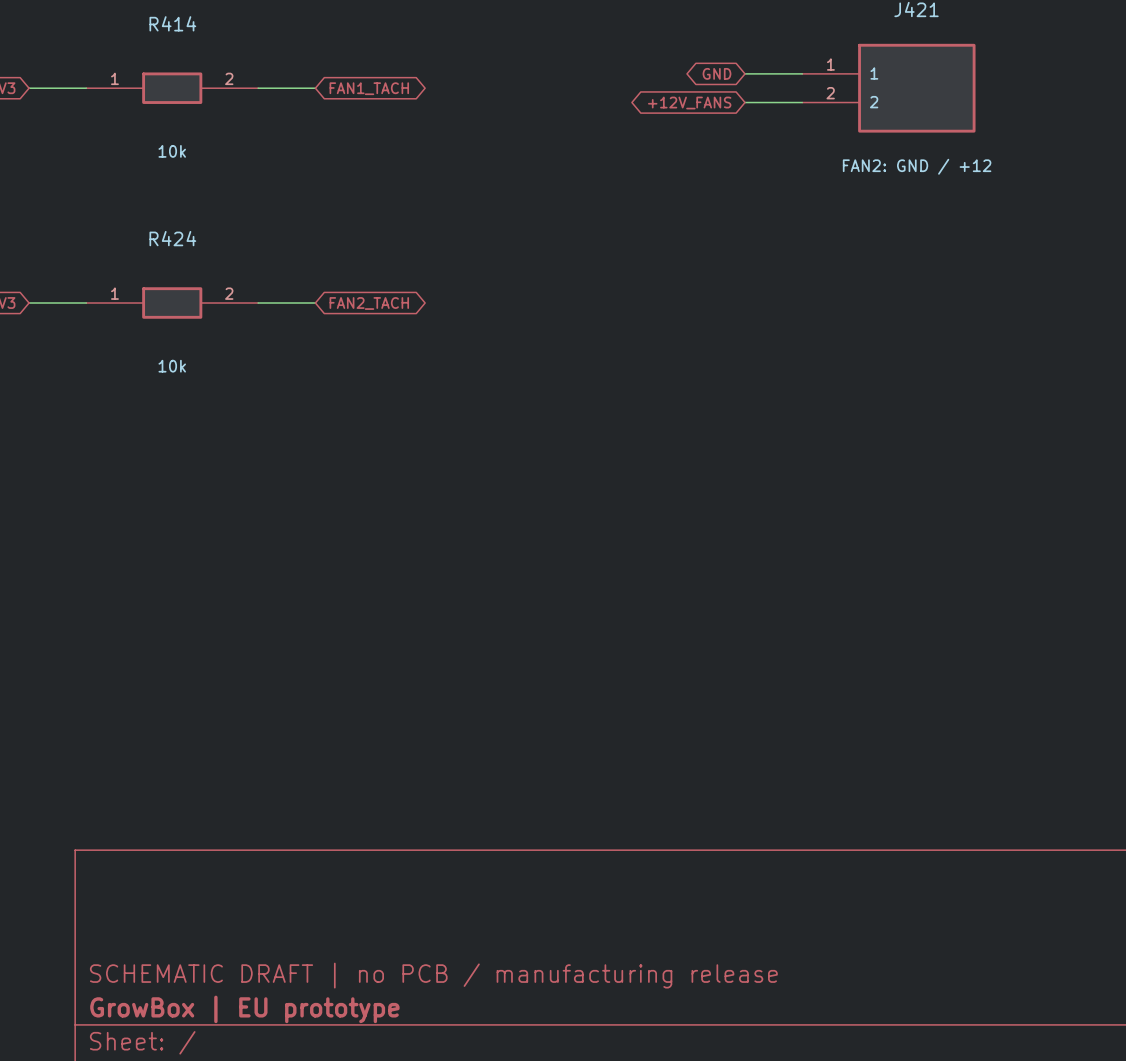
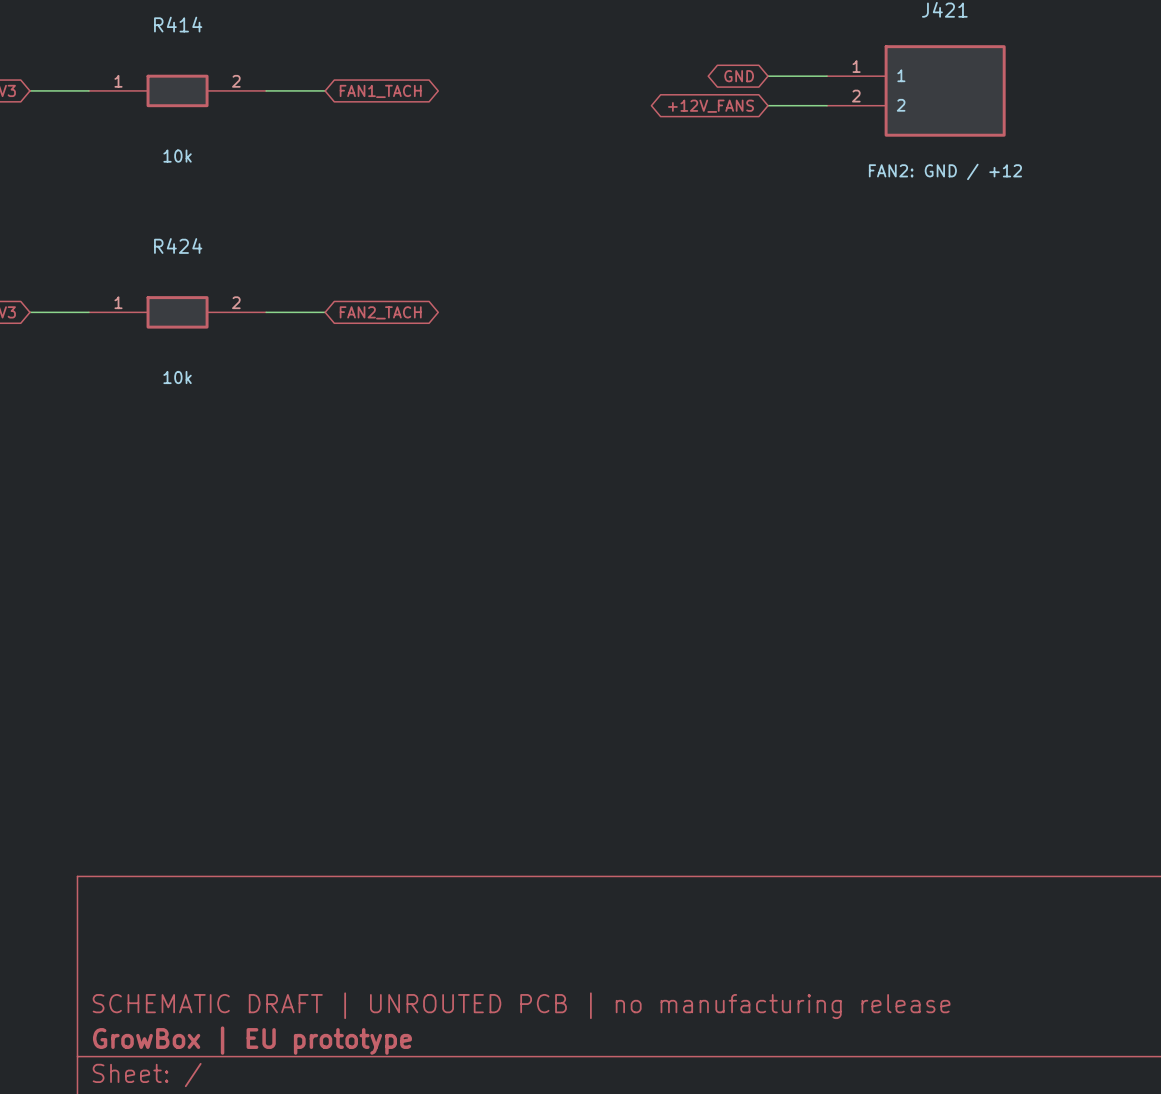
title block: SCHEMATIC DRAFT | no PCB / manufacturing release (433, 975) -> SCHEMATIC DRAFT | UNROUTED PCB | no manufacturing release (521, 1005)

